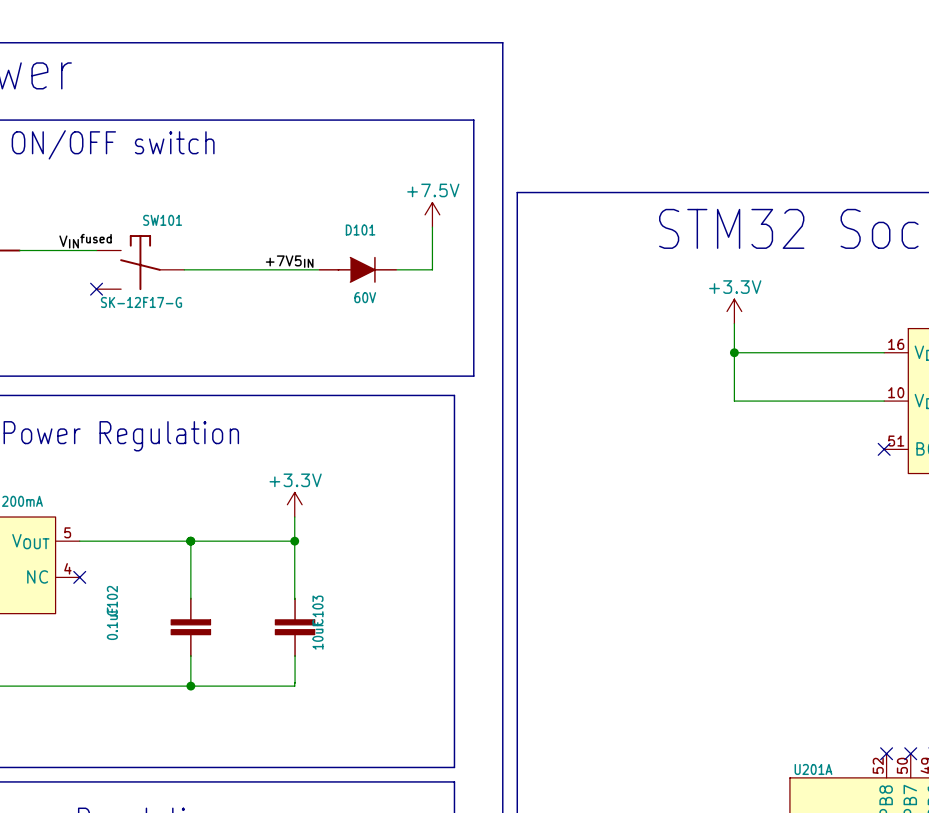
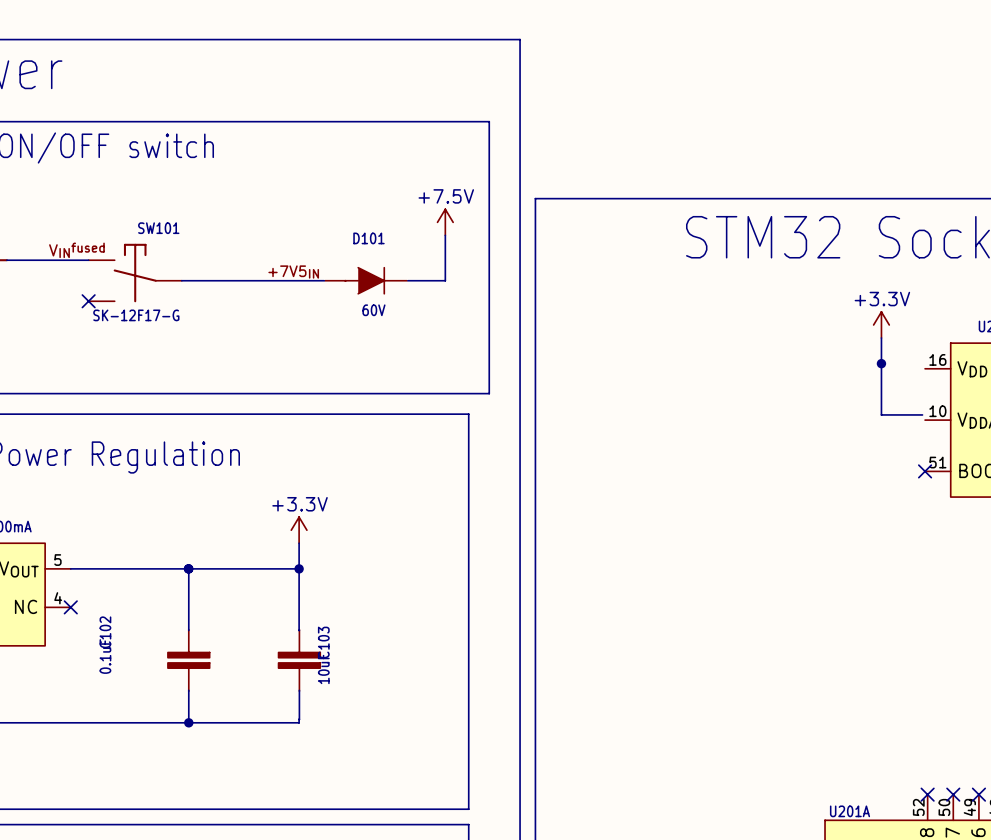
power symbol position: +3.3V (734, 311) -> +3.3V (881, 324)
wire: (734, 323) (734, 401) (884, 401) -> none
wire: none -> (881, 338) (881, 414) (922, 414)
junction: none -> (881, 363)
wire: (734, 352) (884, 352) -> none
junction: (734, 352) -> none

